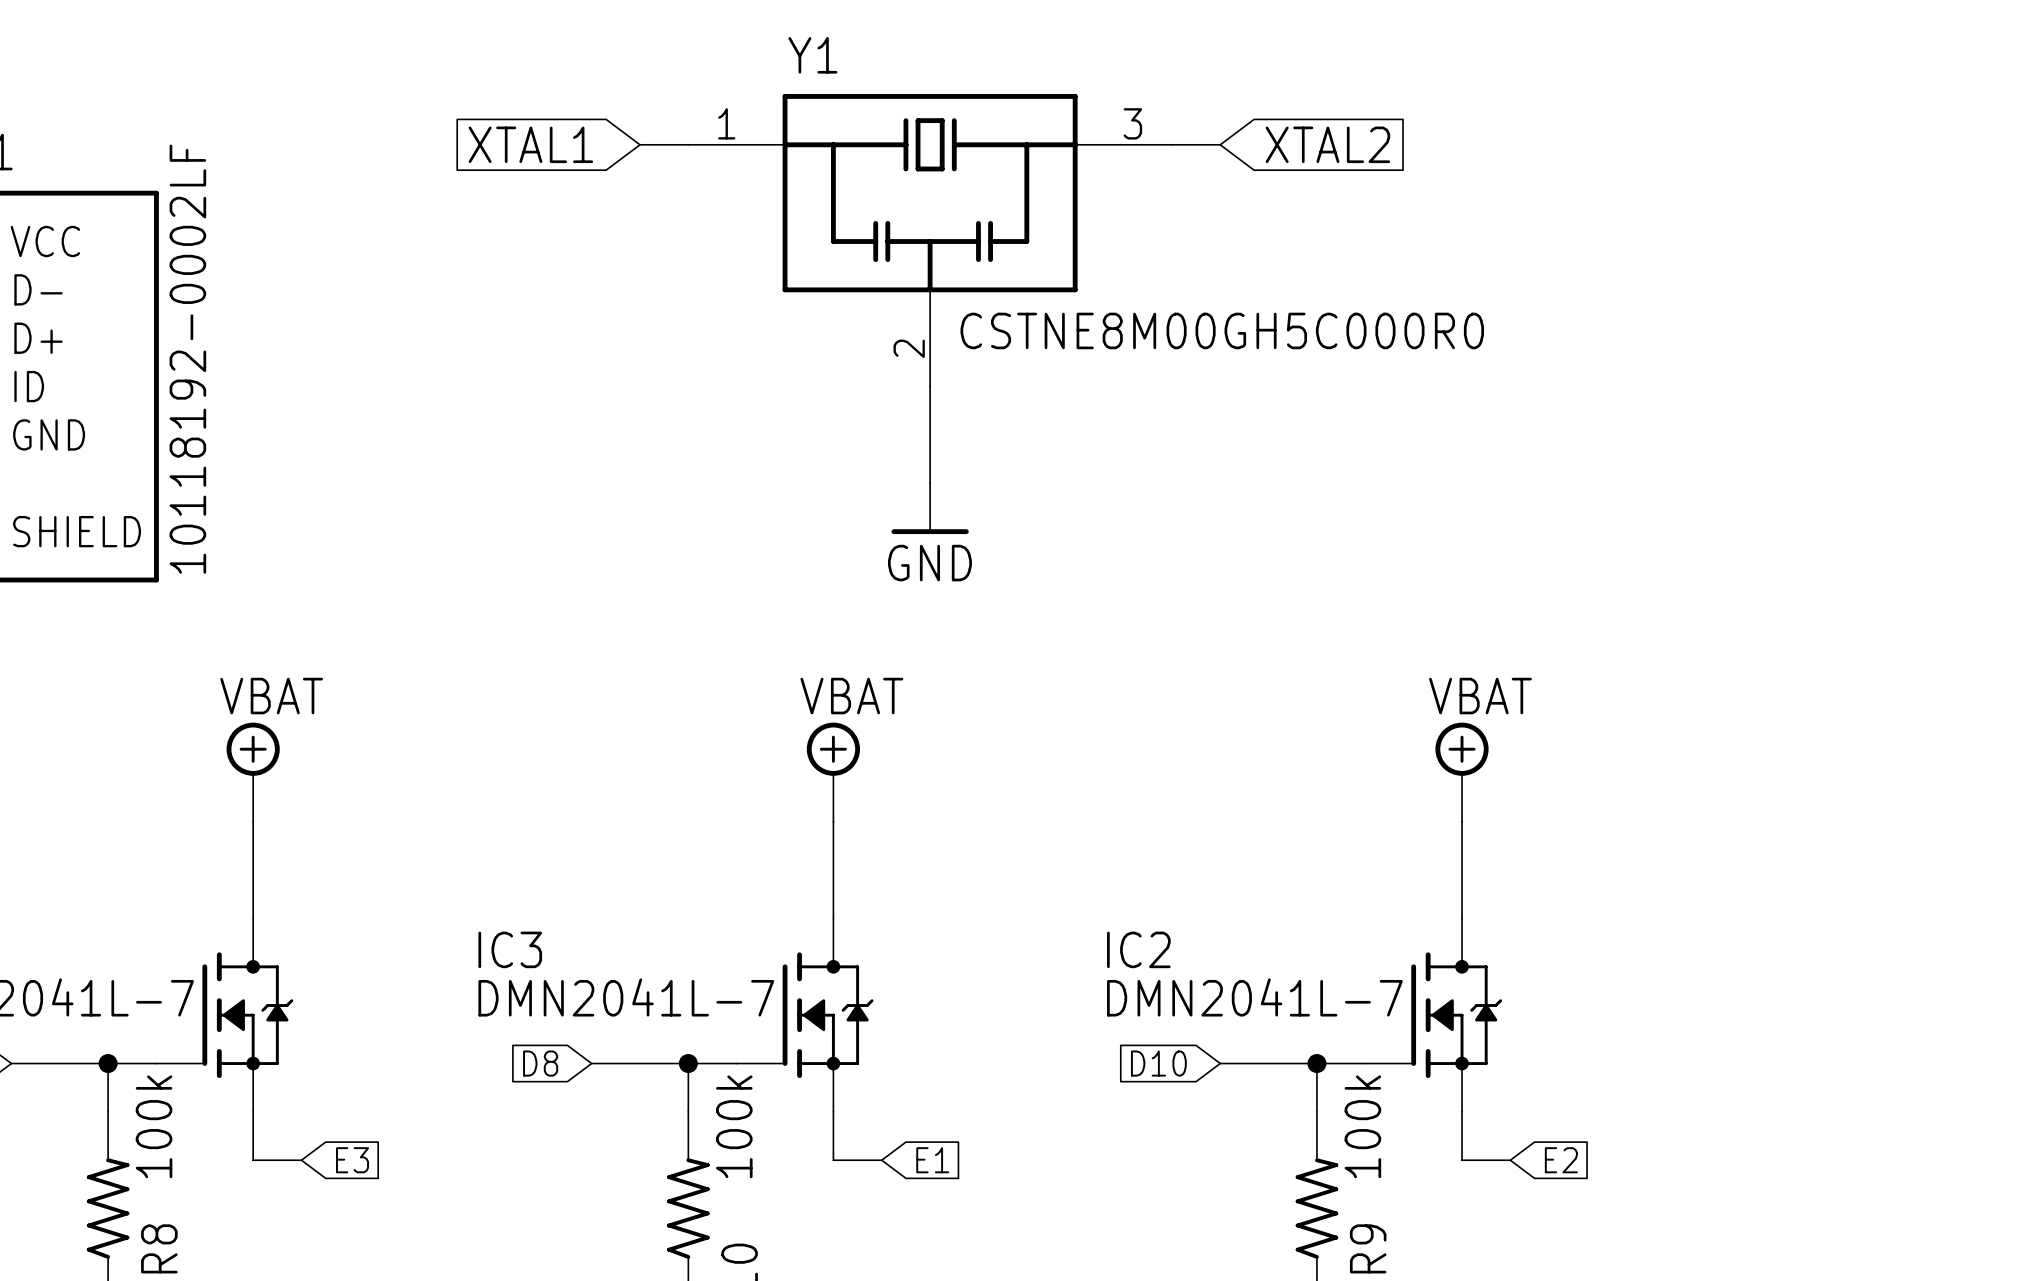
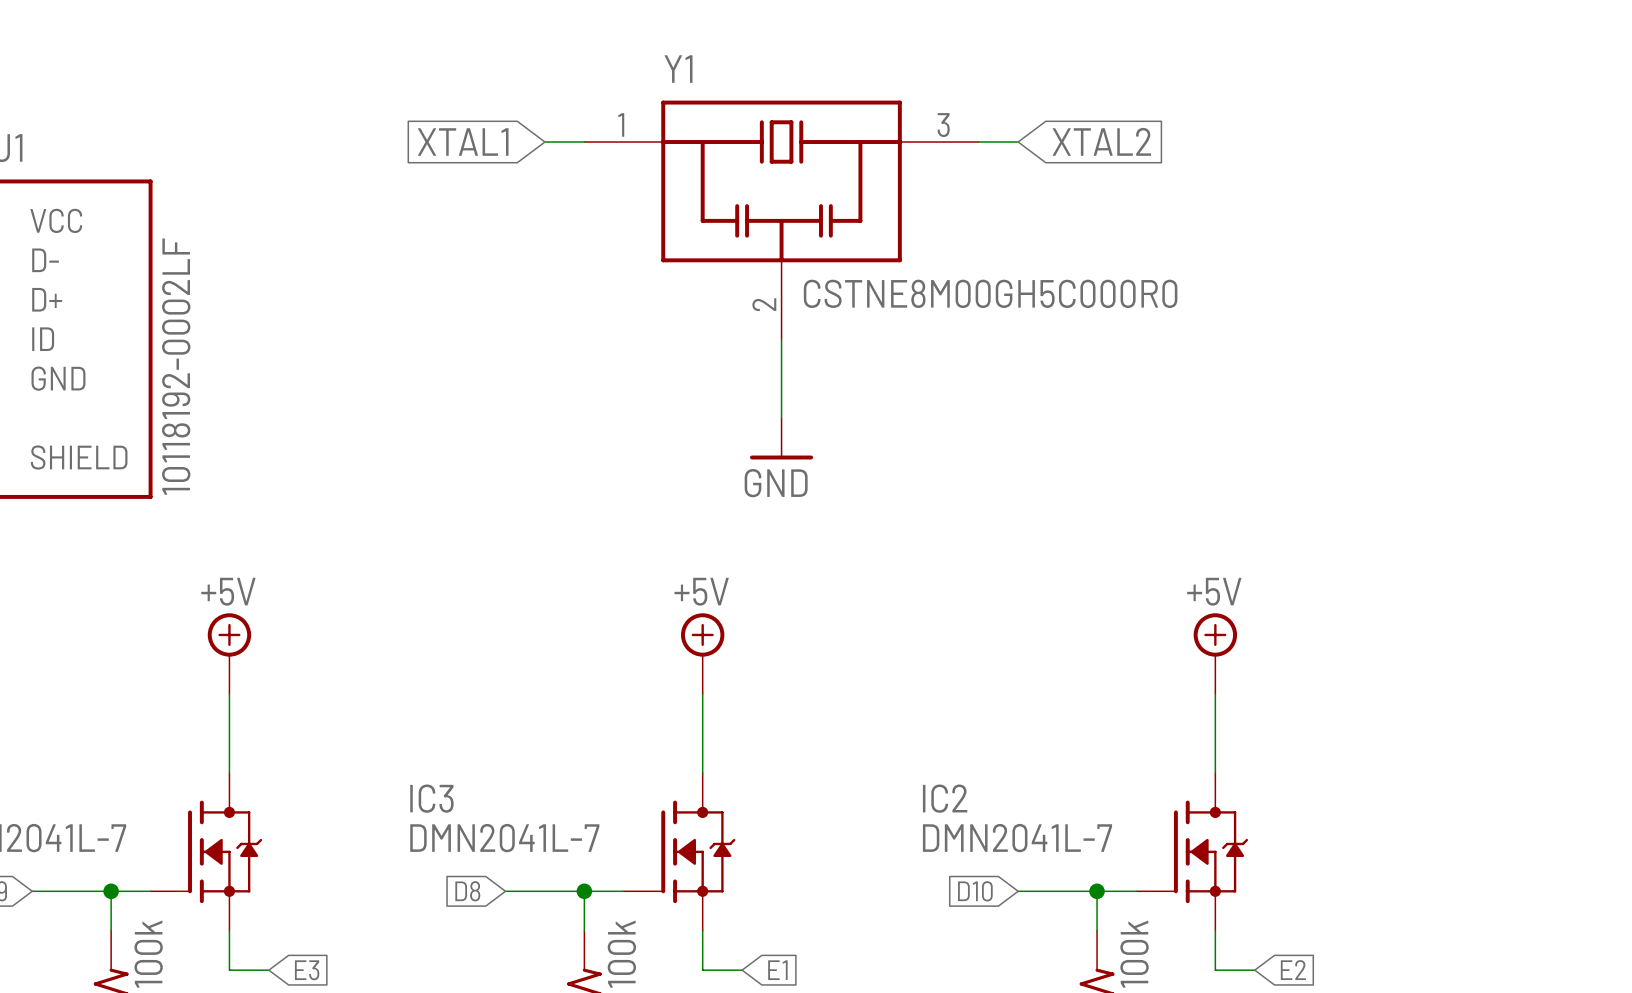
power symbol: VBAT (253, 772) -> +5V (229, 653)
power symbol: VBAT (833, 772) -> +5V (702, 653)
power symbol: VBAT (1462, 772) -> +5V (1215, 653)

